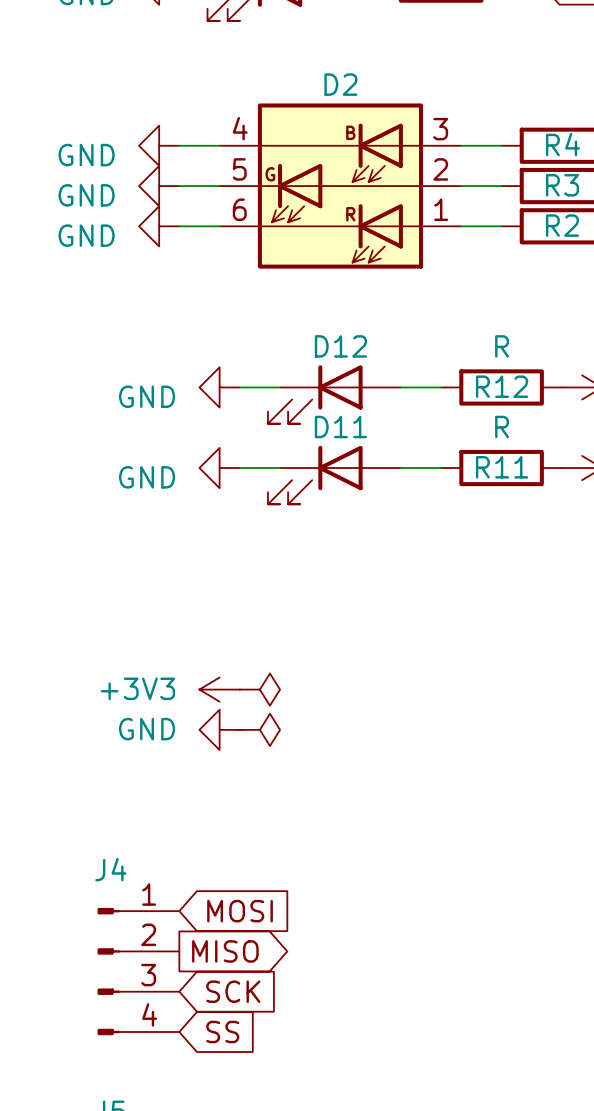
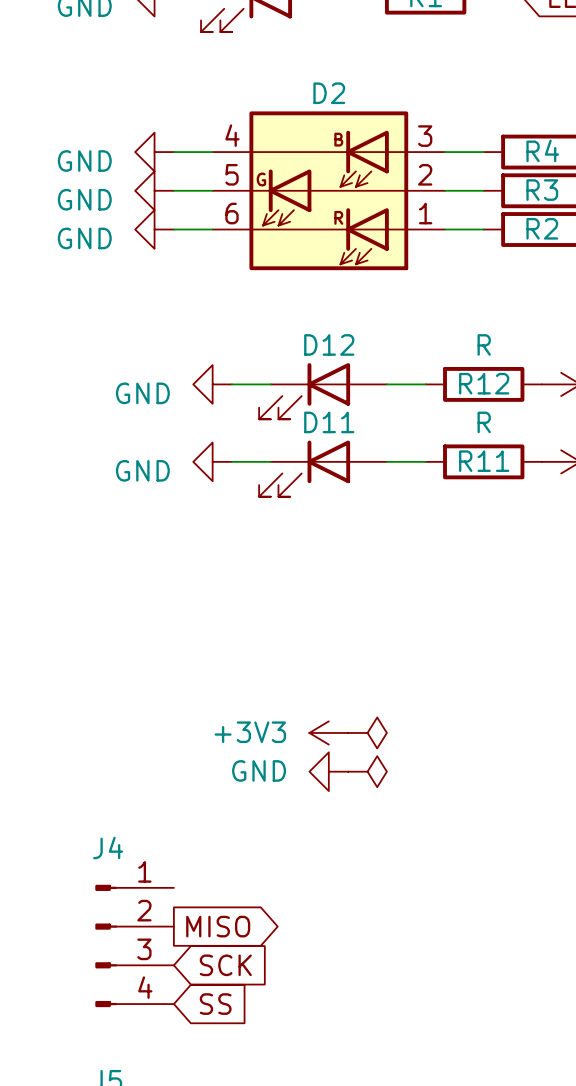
power symbol position: +3V3 (219, 689) -> +3V3 (328, 732)
power symbol: (259, 689) -> none
power symbol position: GND (219, 729) -> GND (328, 771)
power symbol: (259, 729) -> none
power symbol: none -> (367, 732)
power symbol: none -> (367, 771)
global label: MOSI (240, 911) -> none

